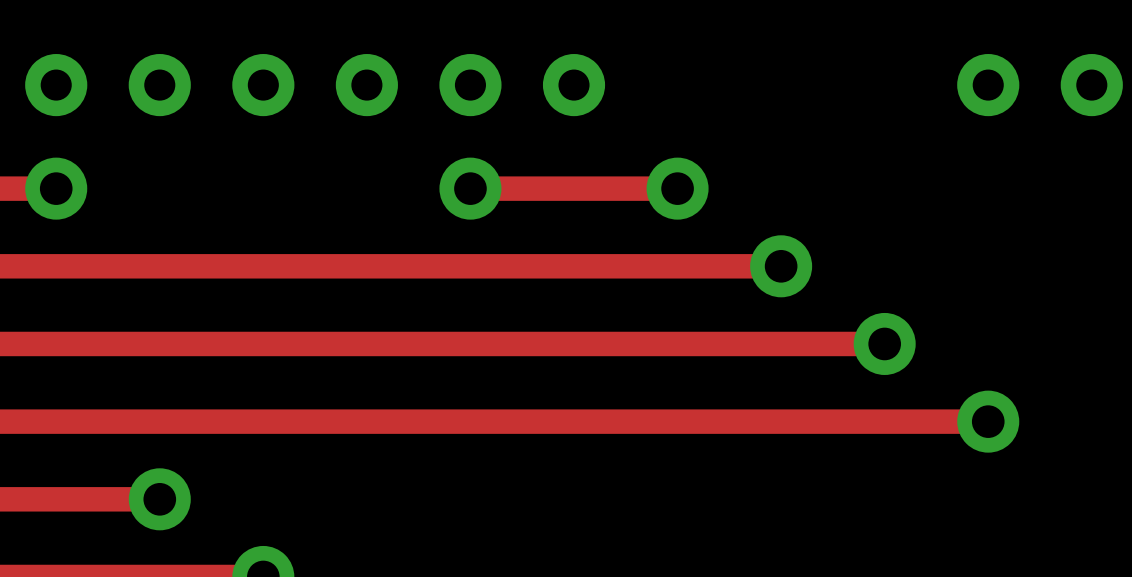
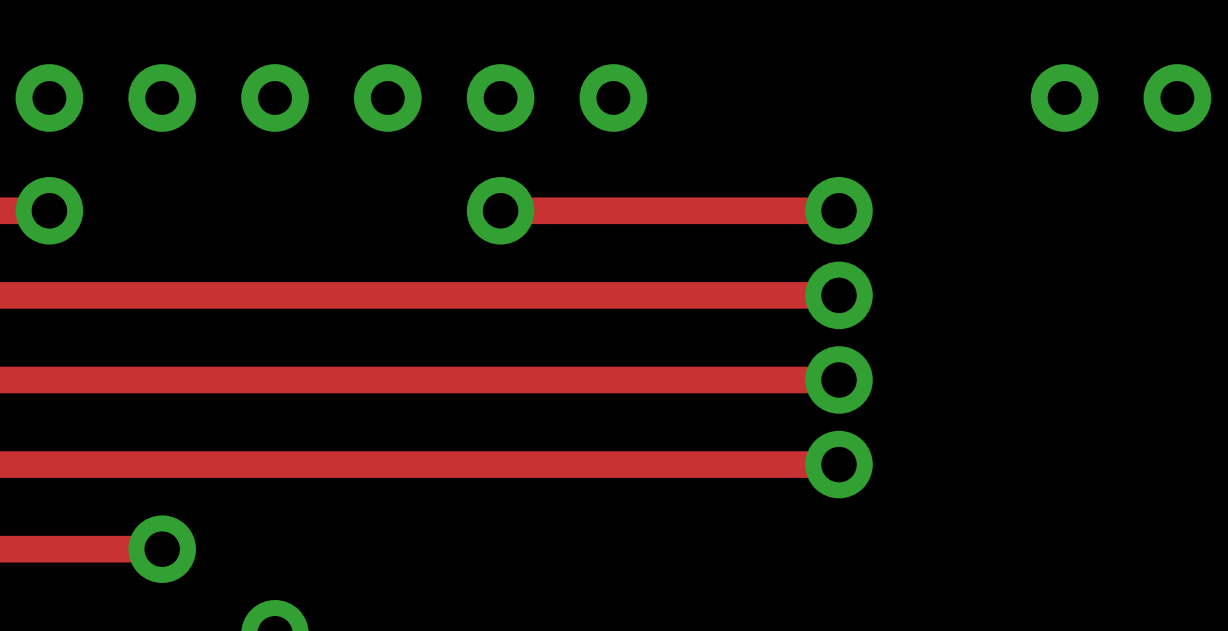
via: (677, 188) -> none
via: none -> (839, 210)
track: (781, 343) (884, 343) -> (726, 210) (839, 210)
via: none -> (839, 379)
via: (884, 343) -> none
track: (781, 421) (988, 421) -> none
via: none -> (839, 464)
via: (988, 421) -> none

